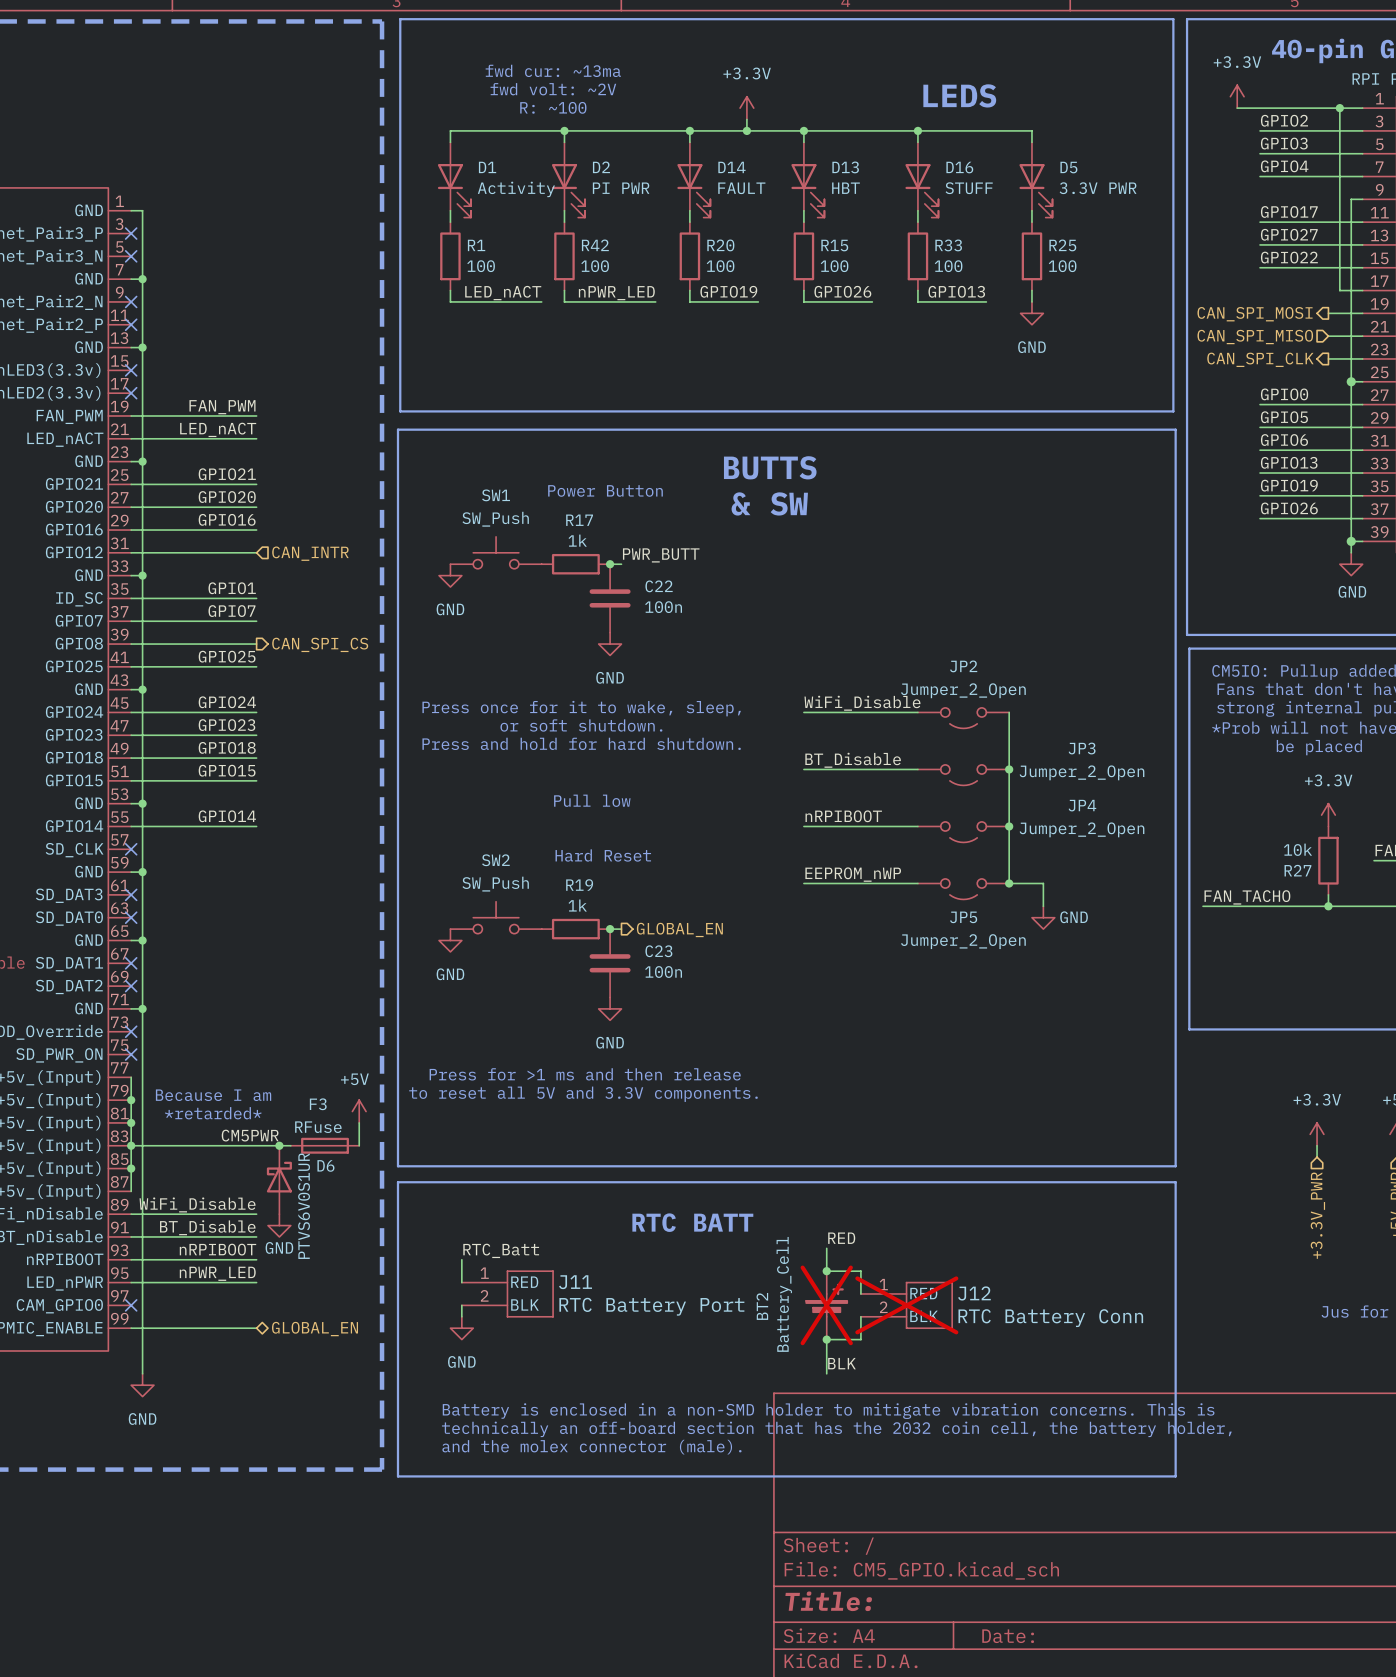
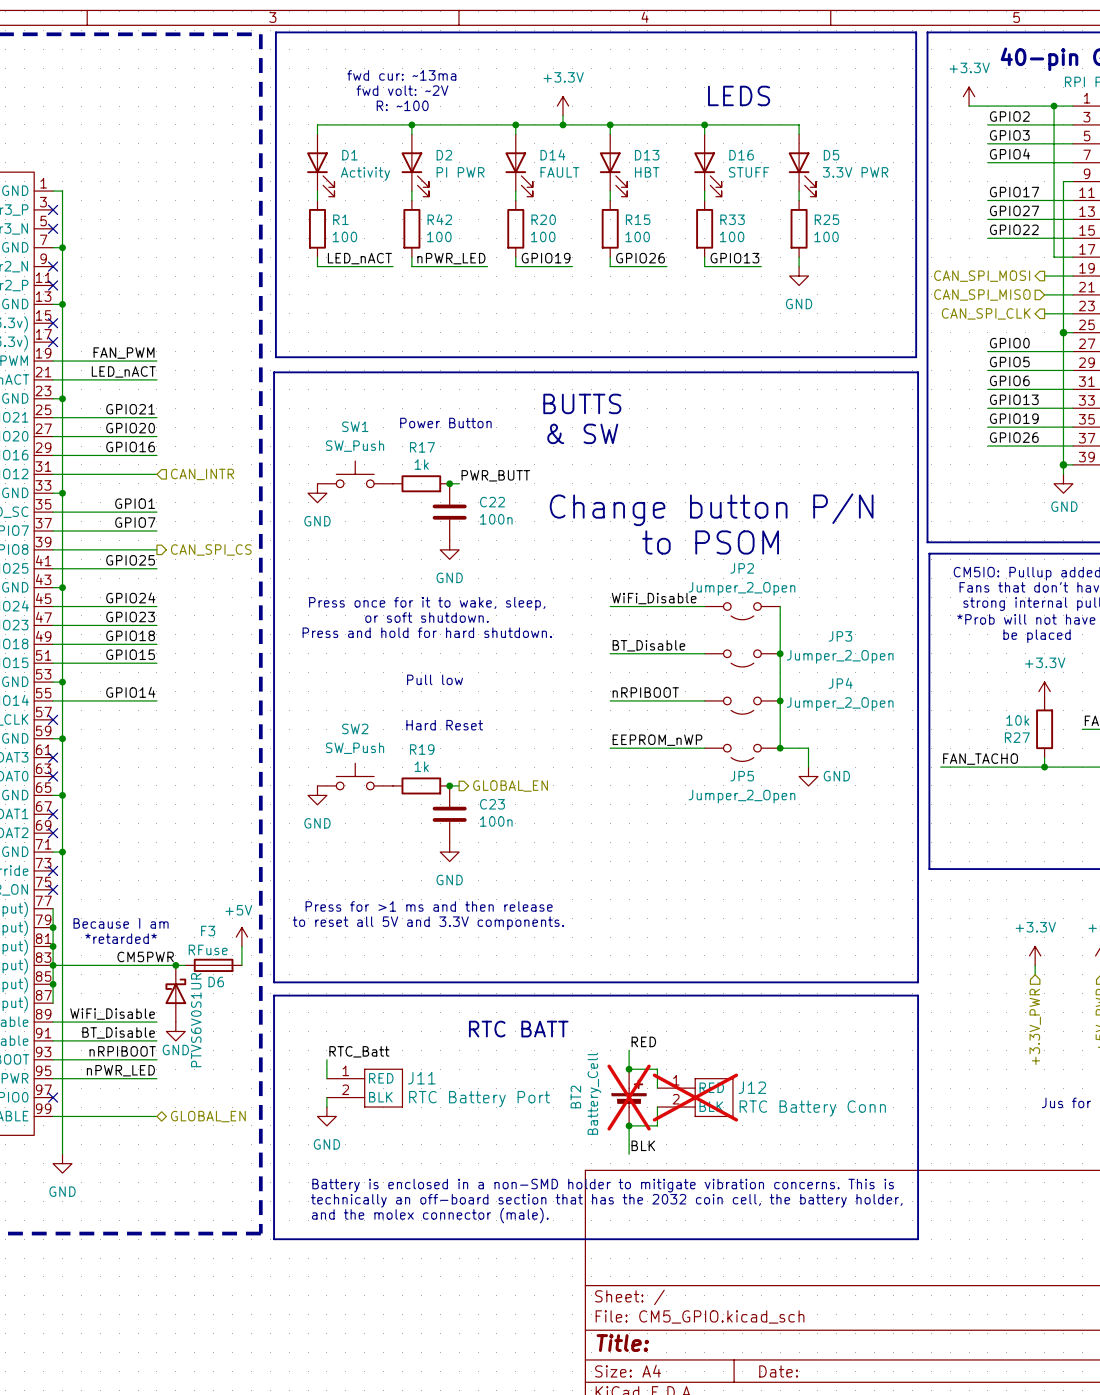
text: none -> Change button P/N (711, 509)
text: none -> to PSOM (710, 542)

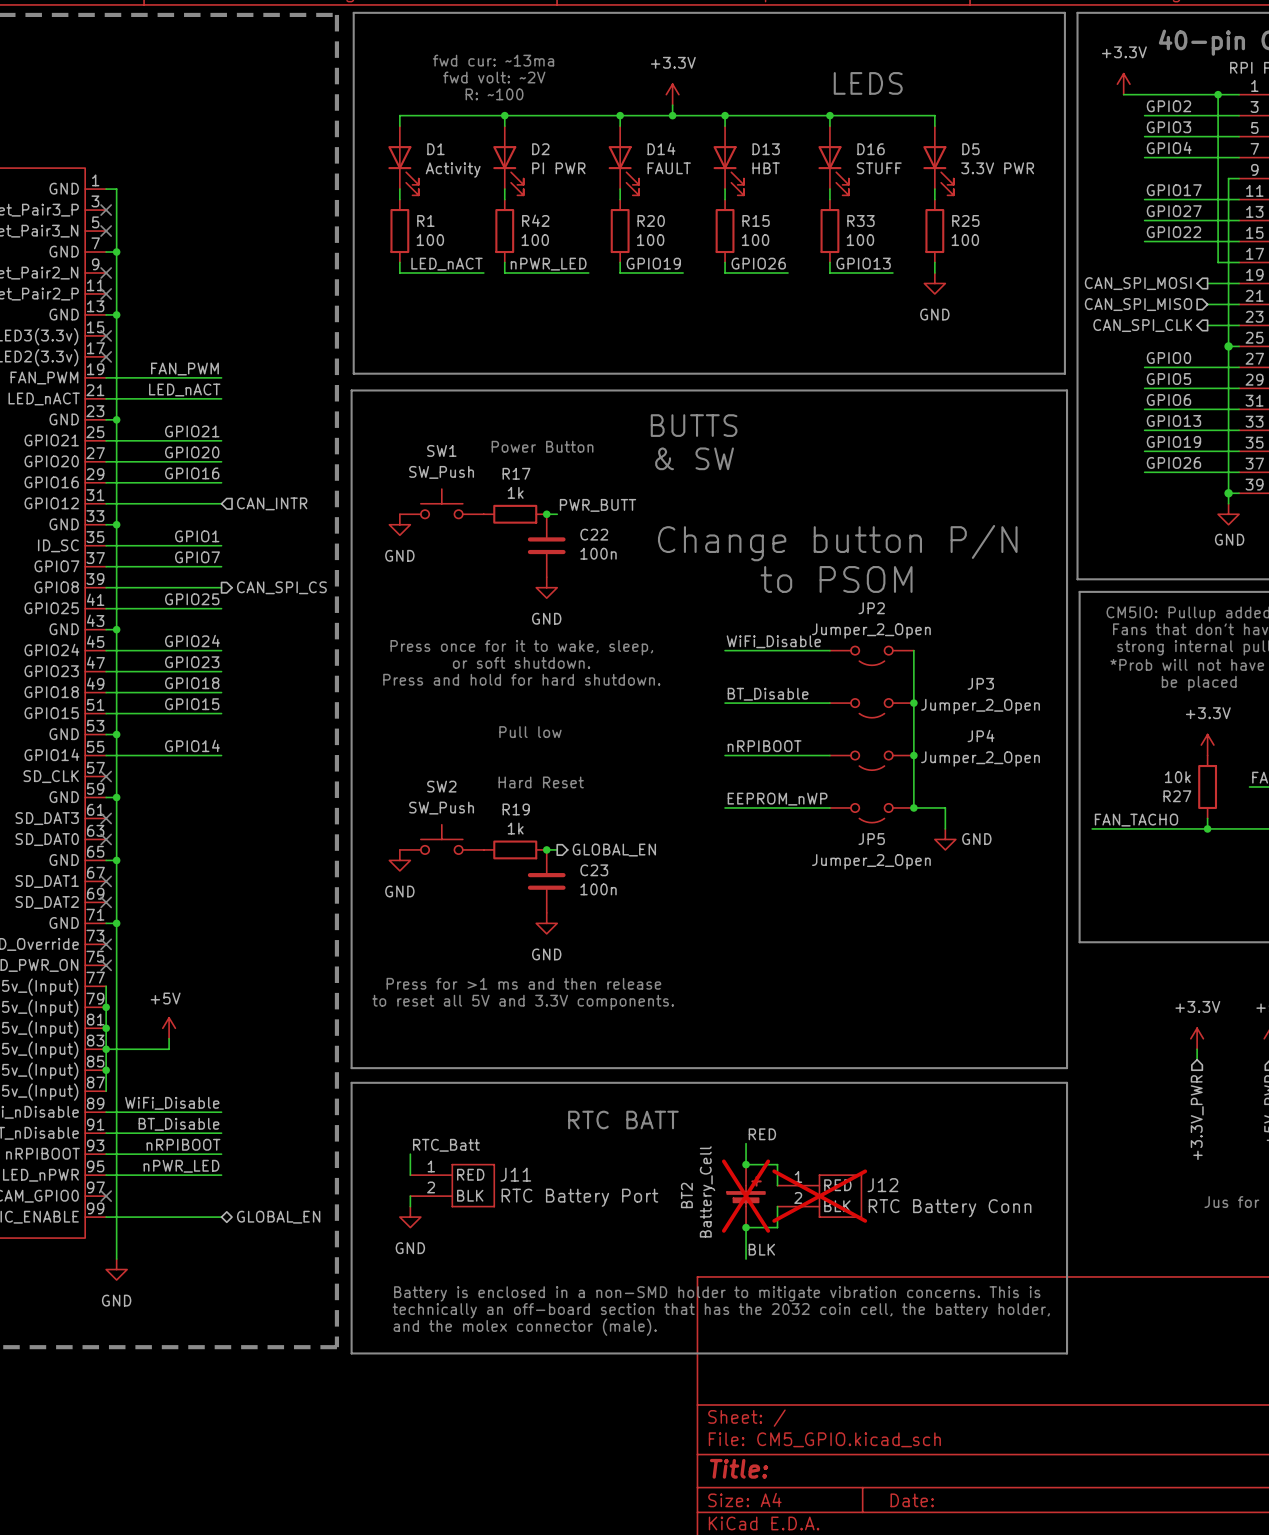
text: Because I am (121, 923) -> none
power symbol position: +5V (241, 937) -> +5V (169, 1028)
text: *retarded* (121, 938) -> none
wire: (241, 946) (241, 965) -> none
label: CM5PWR (145, 956) -> none
wire: (109, 965) (185, 965) -> (169, 1049) (169, 1038)
junction: (175, 965) -> none
F3: RFuse (213, 965) -> none
D6: PTVS6V0S1UR (175, 993) -> none
power symbol: GND (175, 1031) -> none

